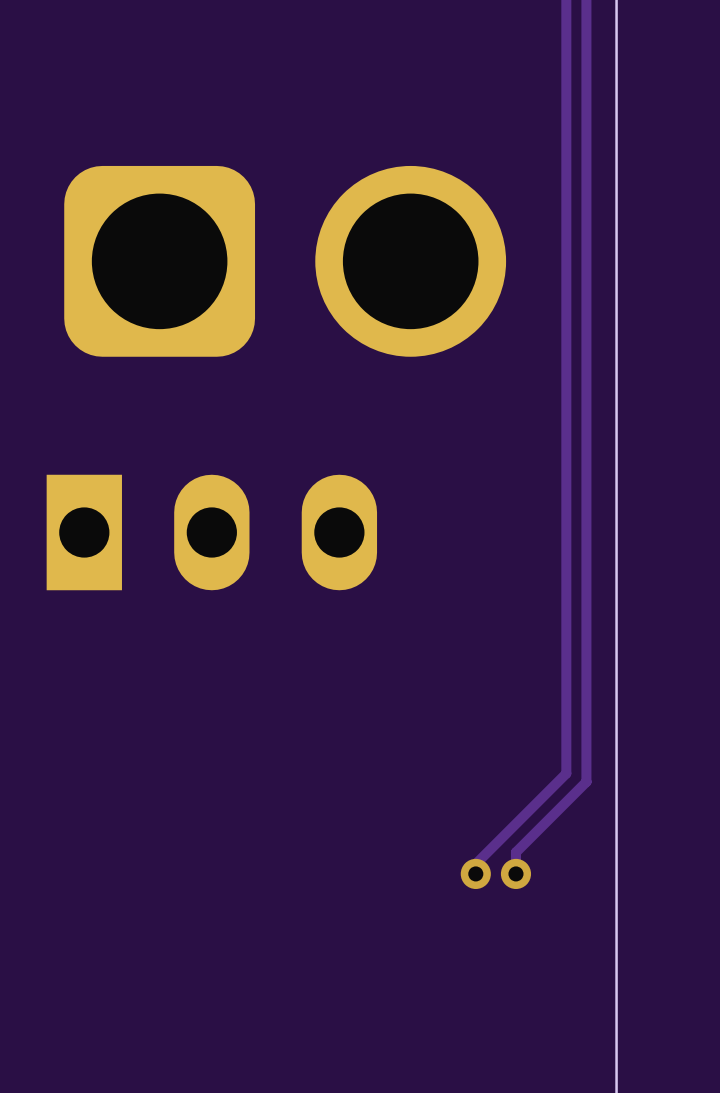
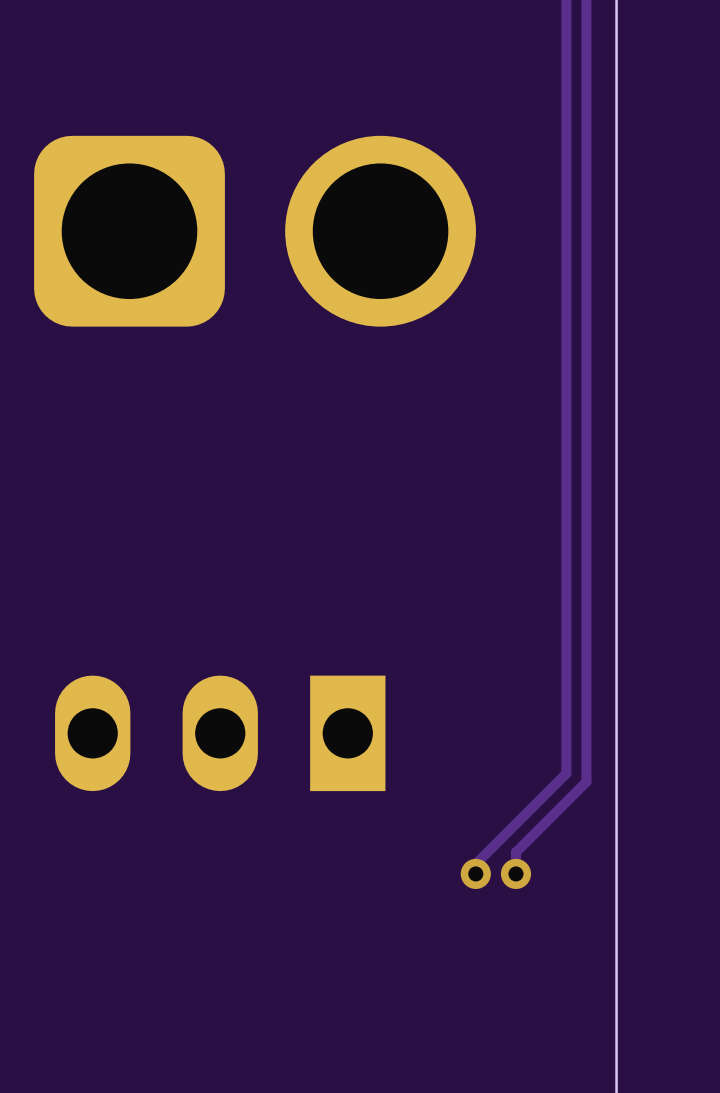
part position: (285, 261) -> (255, 231)
part rotation: 0° (211, 532) -> 180° (220, 733)
part position: (211, 532) -> (220, 733)

